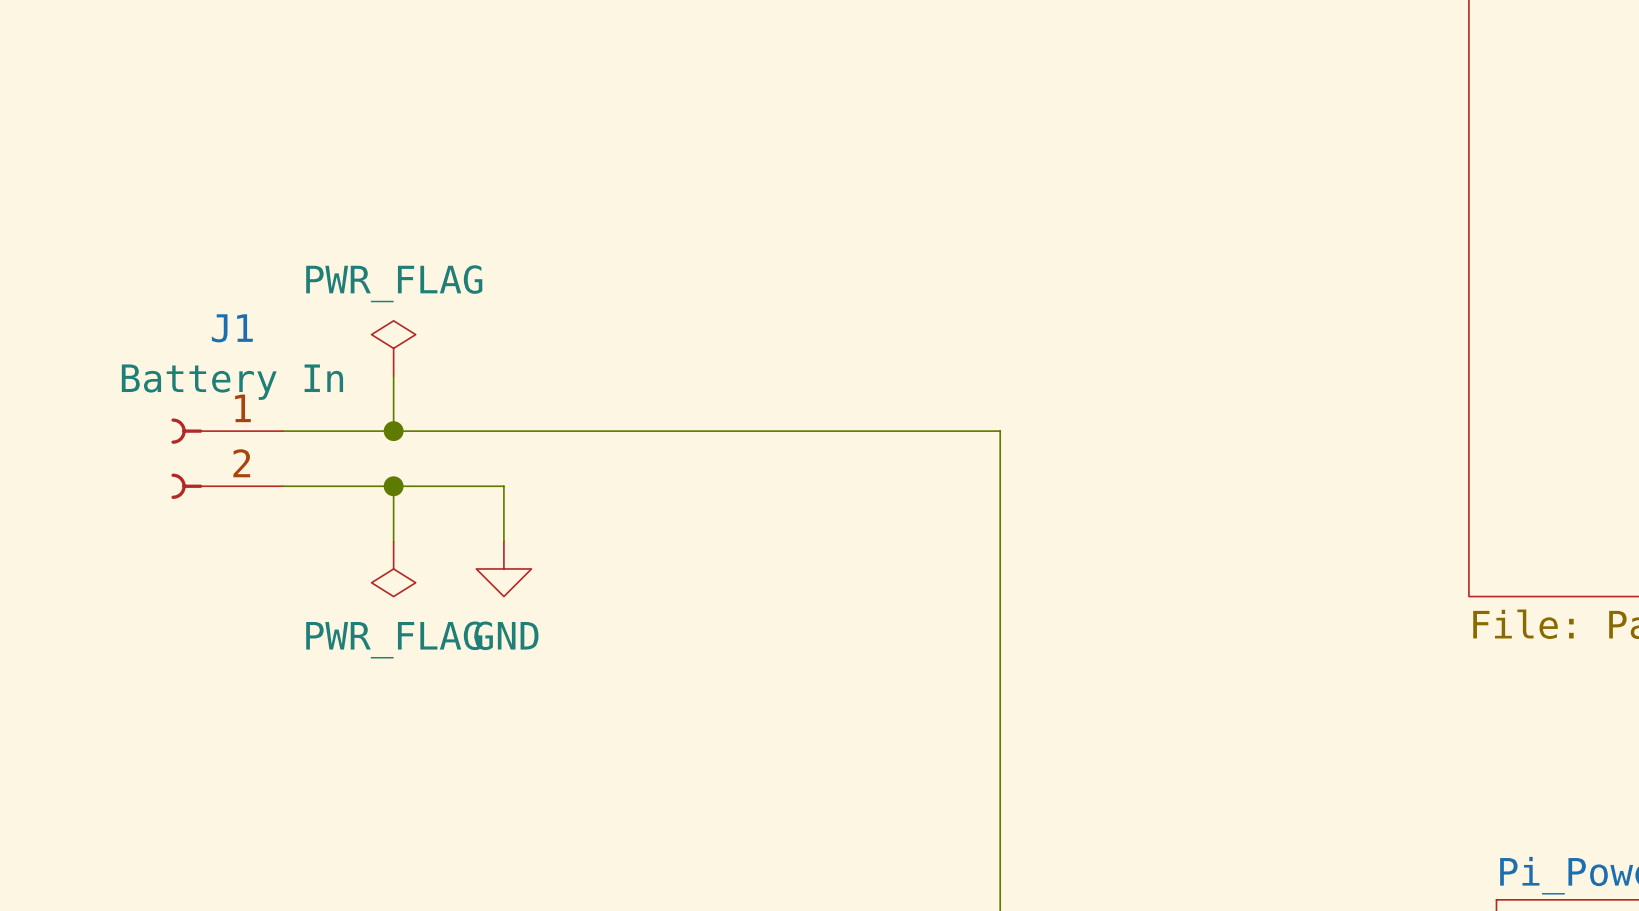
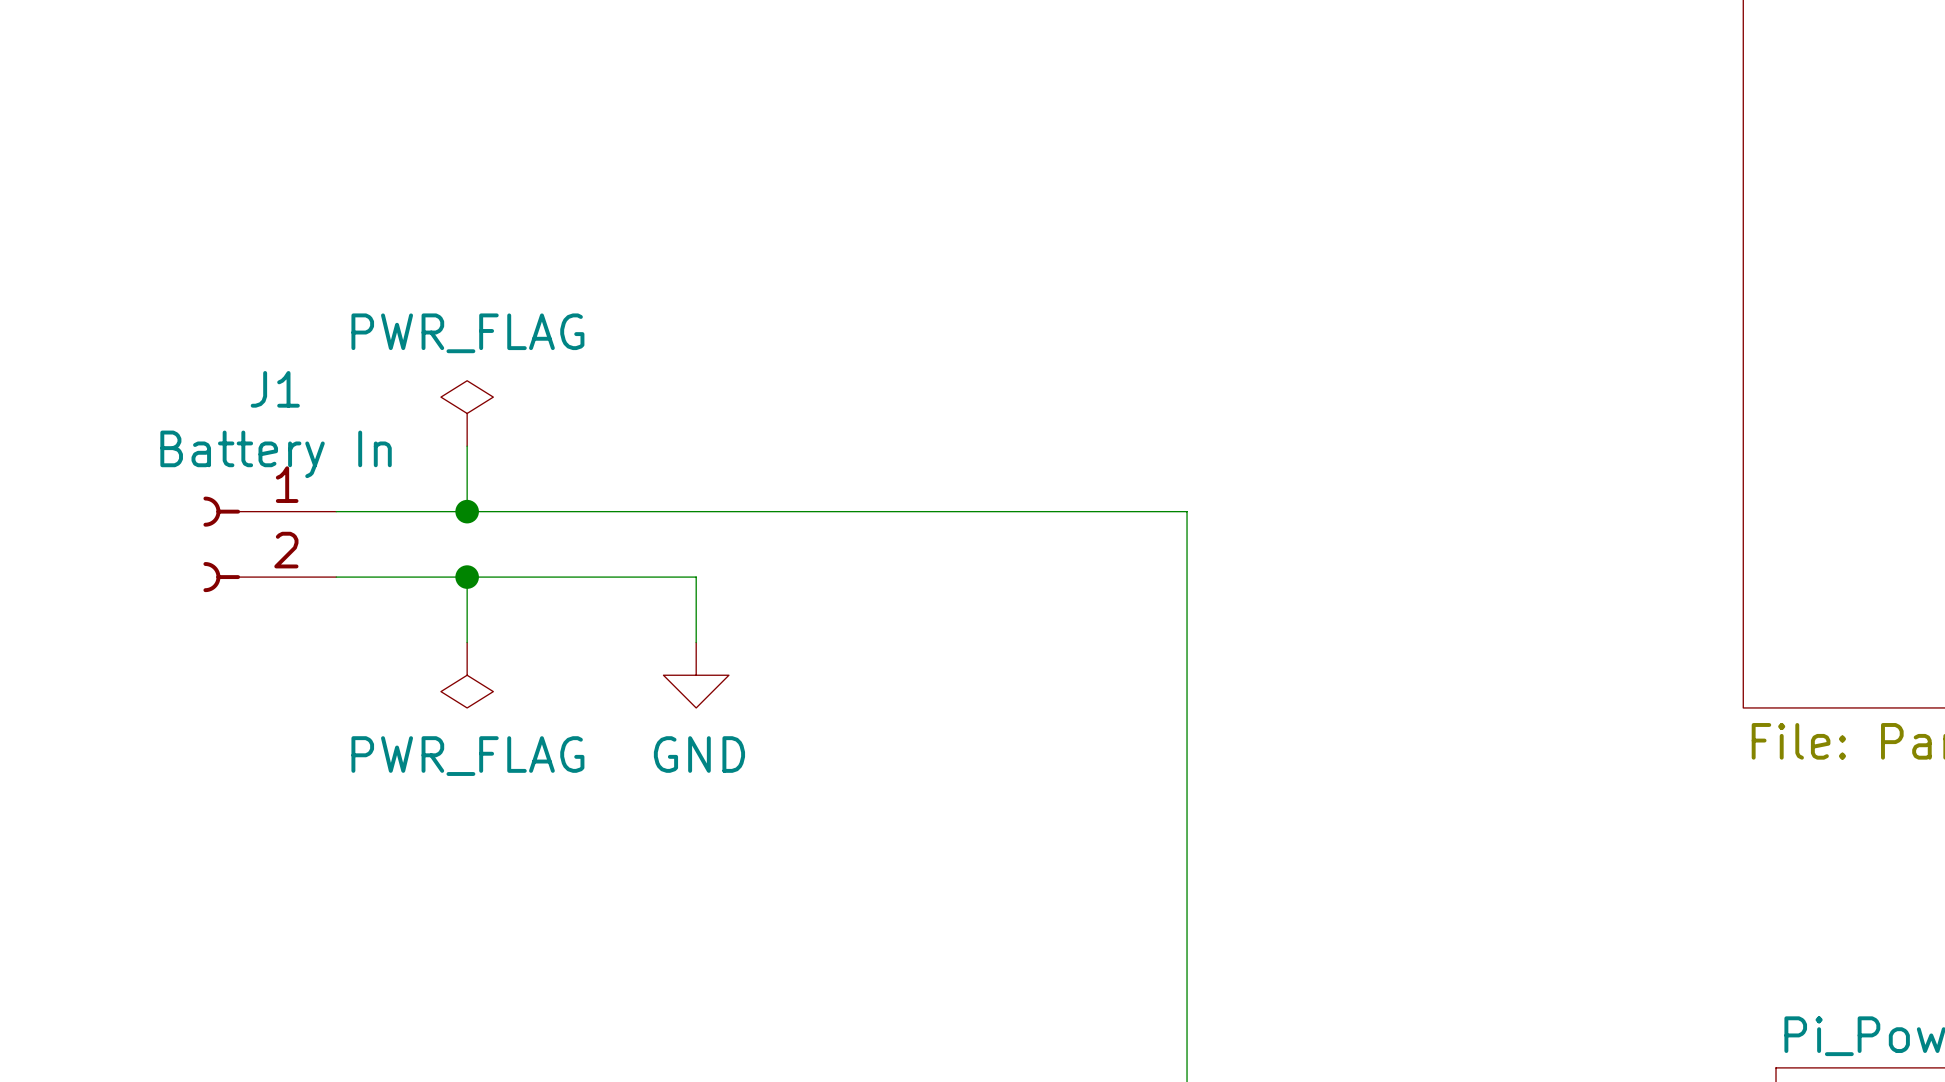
wire: (503, 486) (503, 541) -> (598, 577) (696, 577) (696, 642)
power symbol position: GND (503, 568) -> GND (696, 675)

